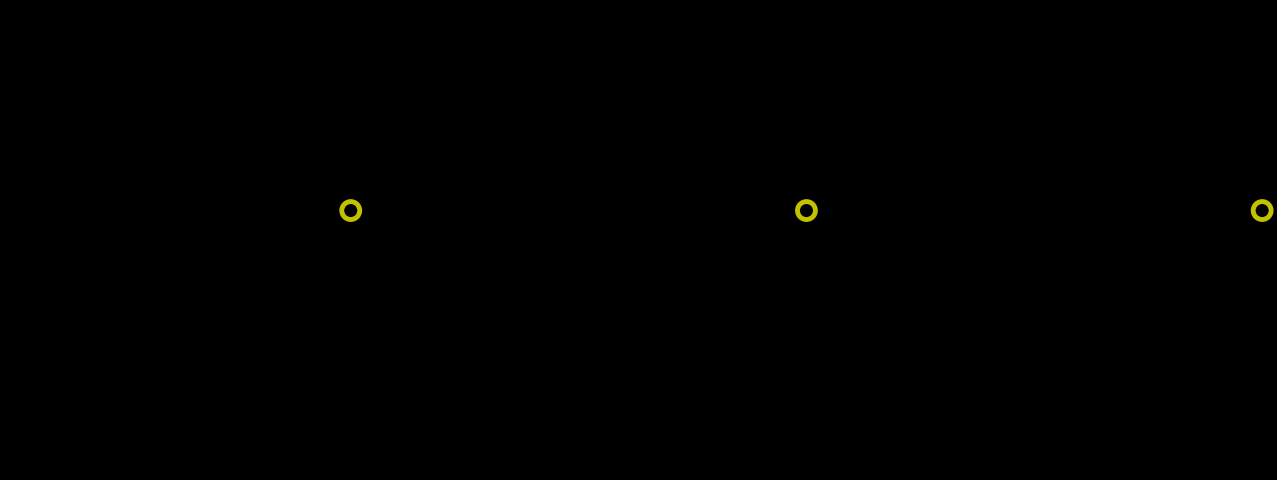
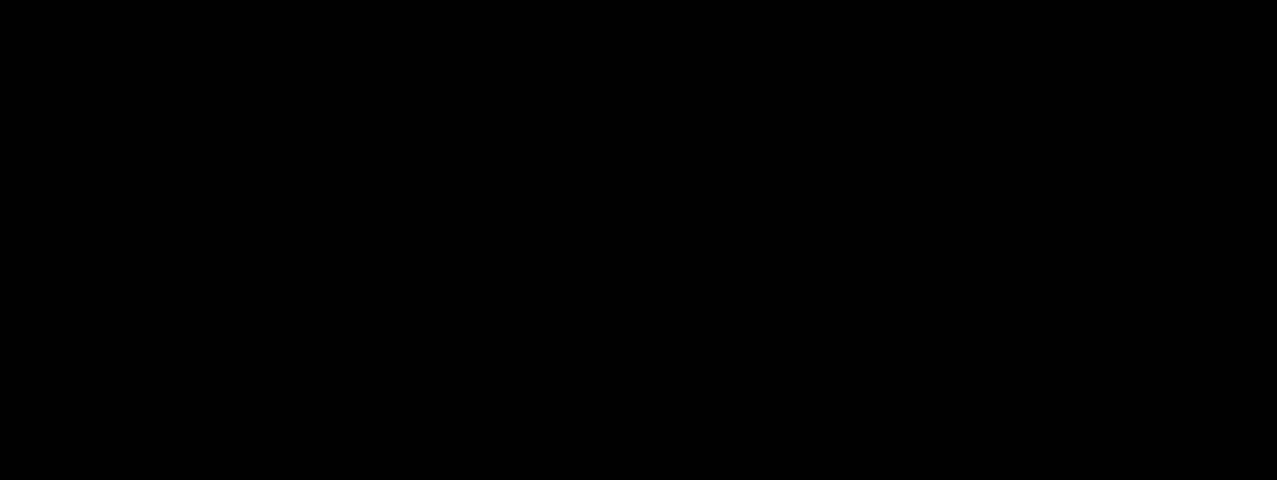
part: (350, 210) -> none
part: (806, 210) -> none
part: (1262, 210) -> none

